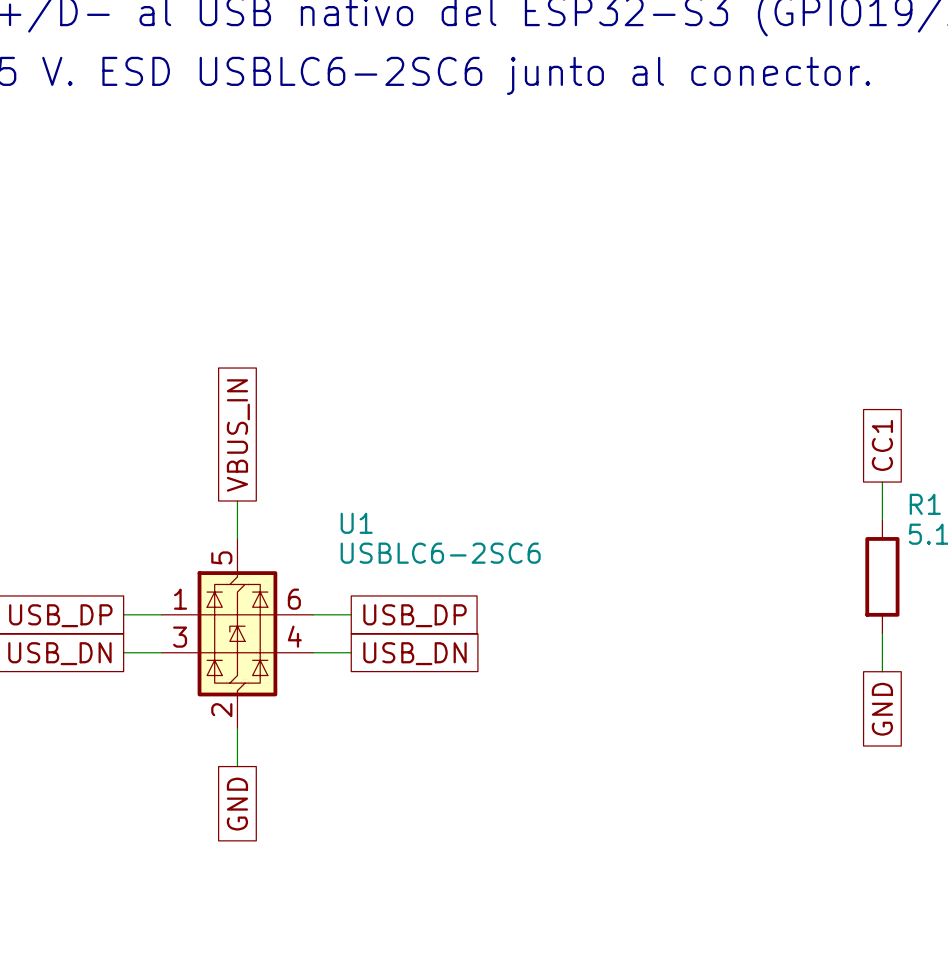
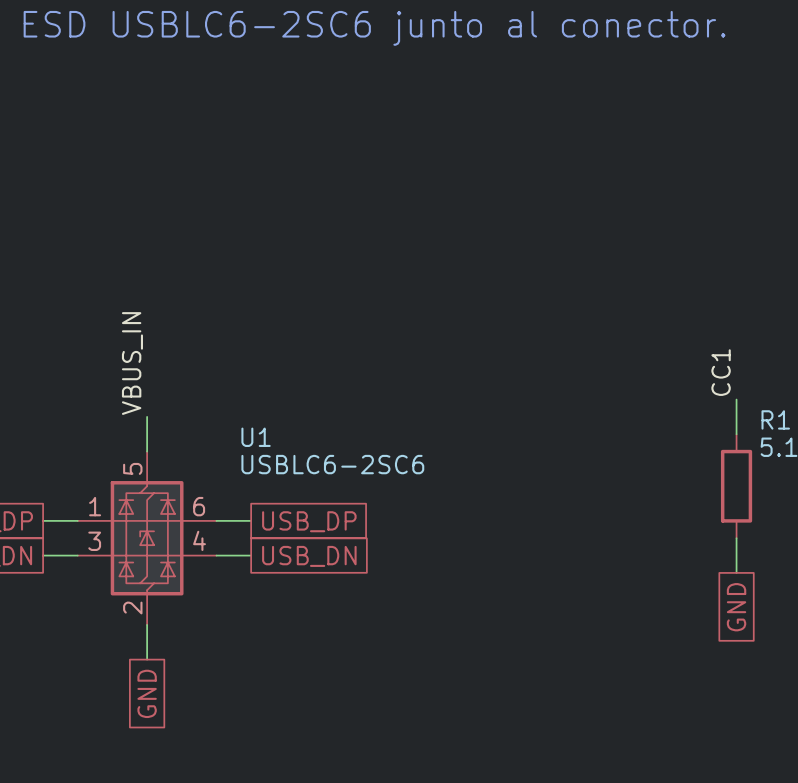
global label: VBUS_IN (238, 435) -> none
label: none -> VBUS_IN (132, 363)
global label: CC1 (882, 445) -> none
label: none -> CC1 (721, 372)

